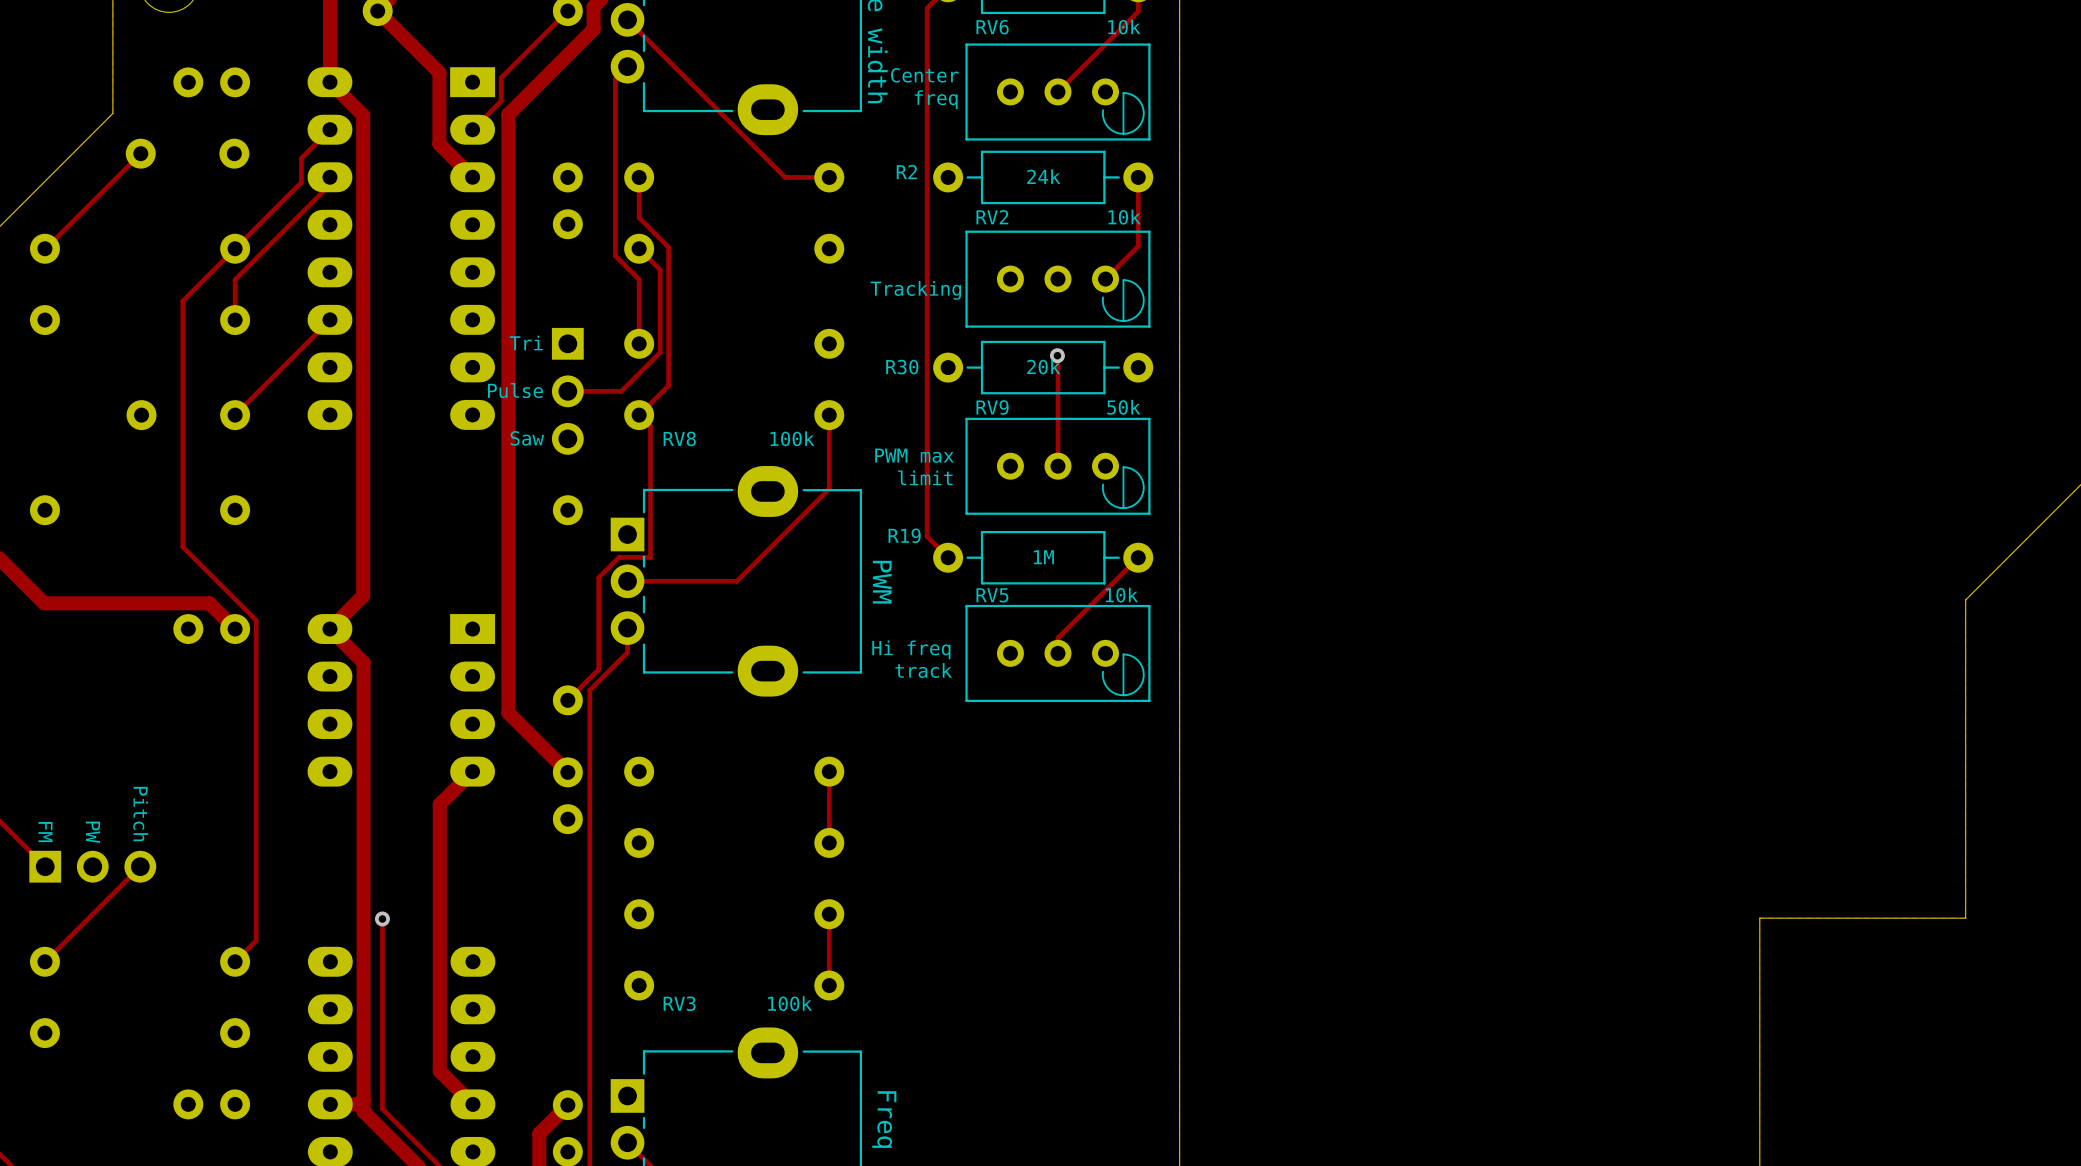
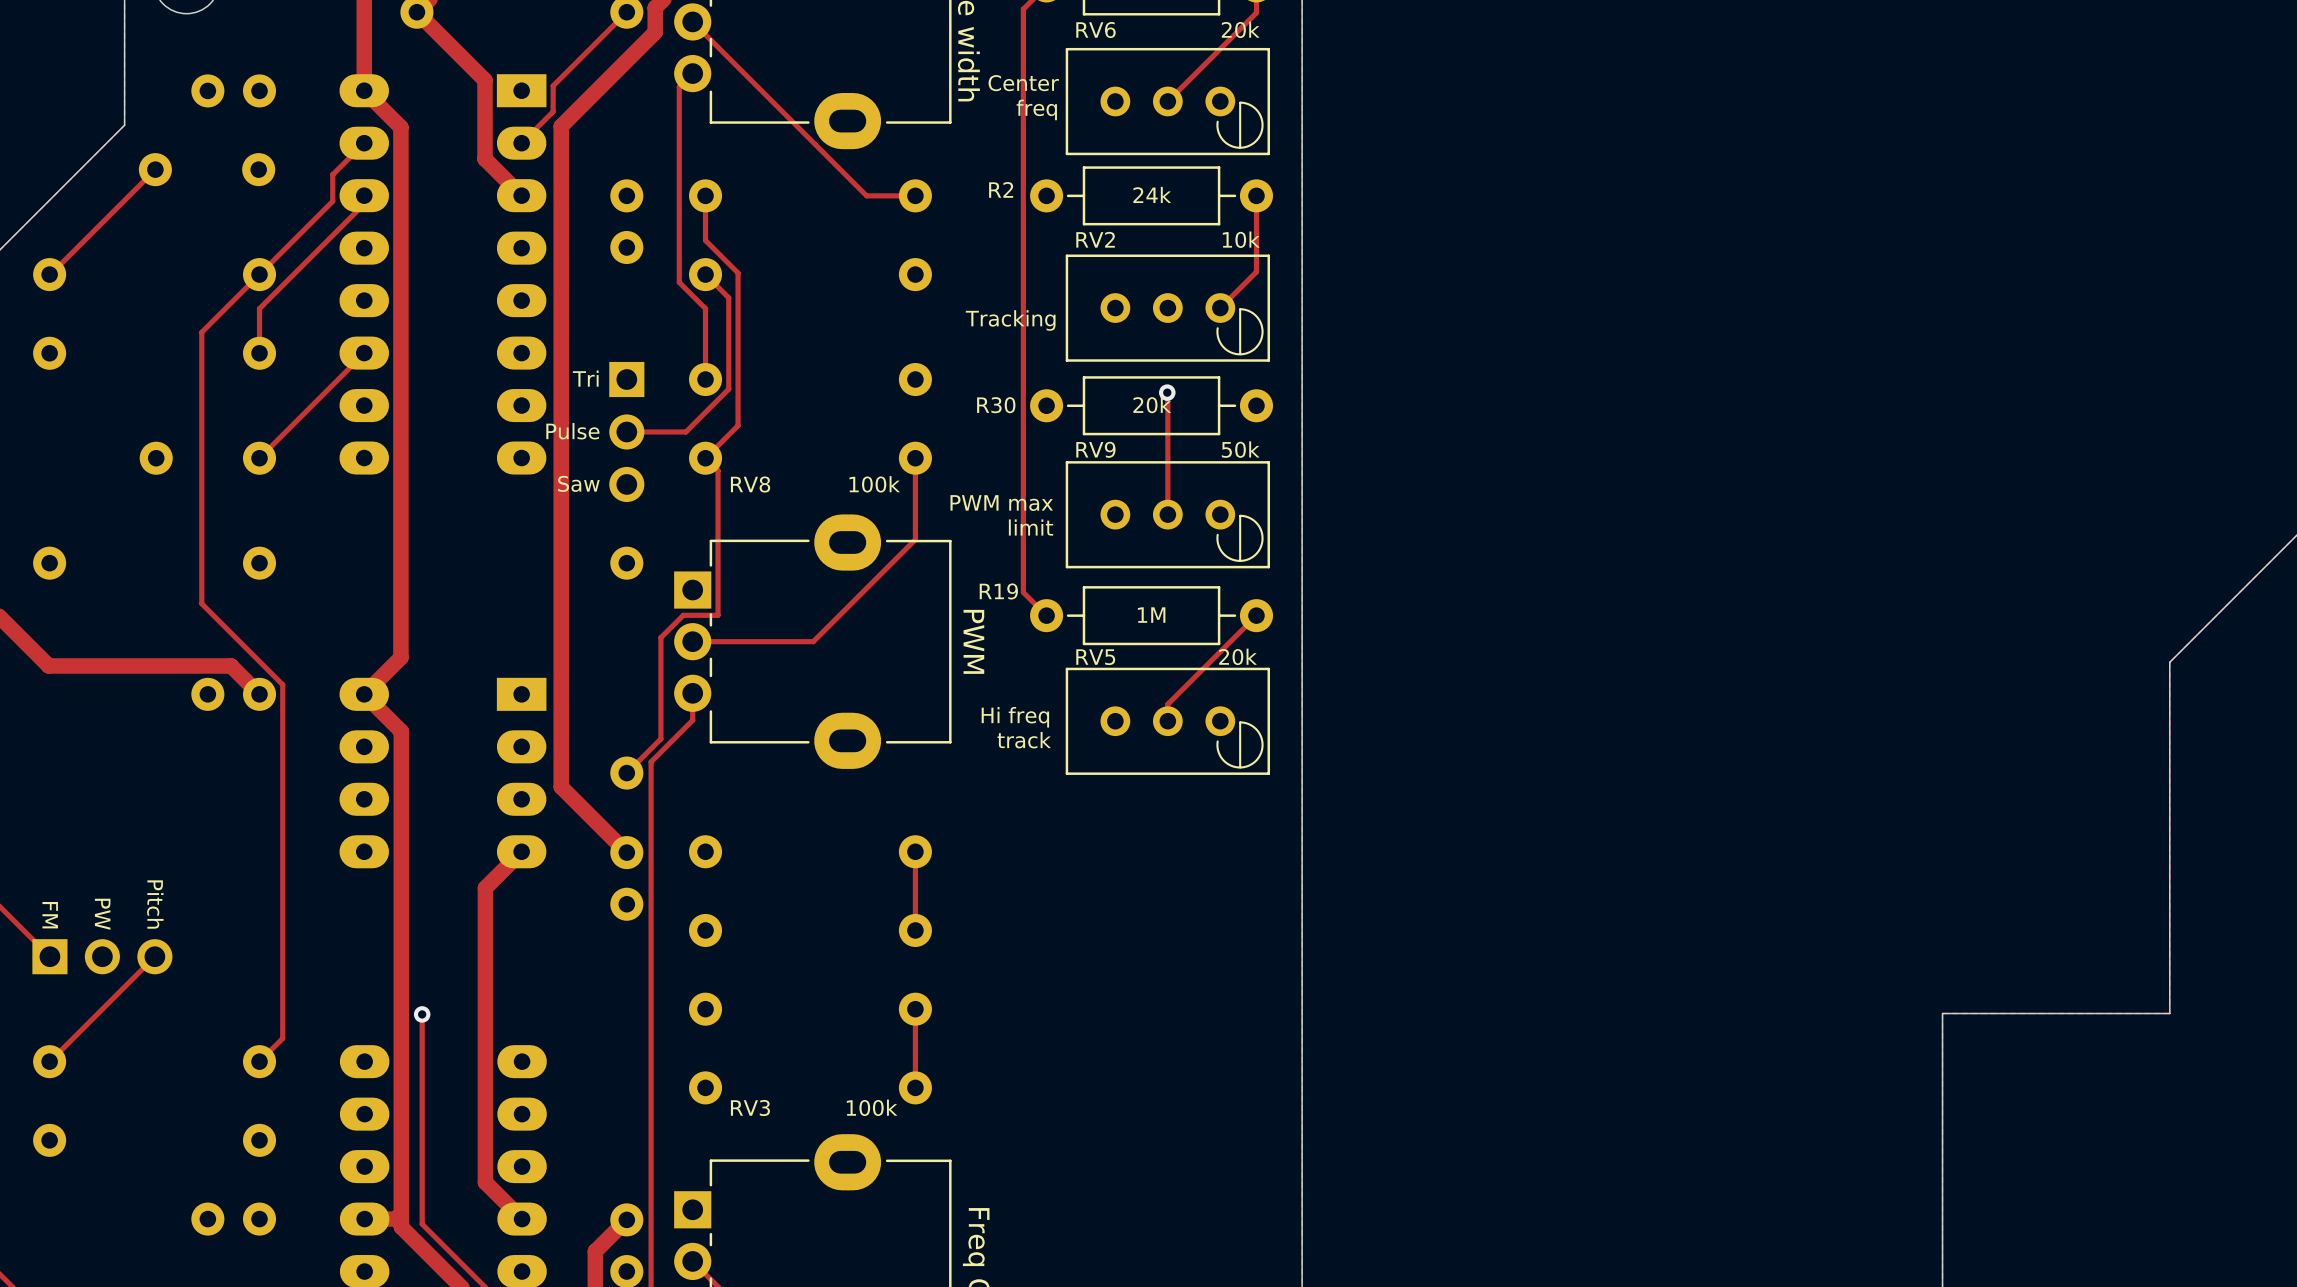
RV6 value: 10k (1124, 27) -> 20k (1240, 29)
RV5 value: 10k (1121, 595) -> 20k (1238, 656)

